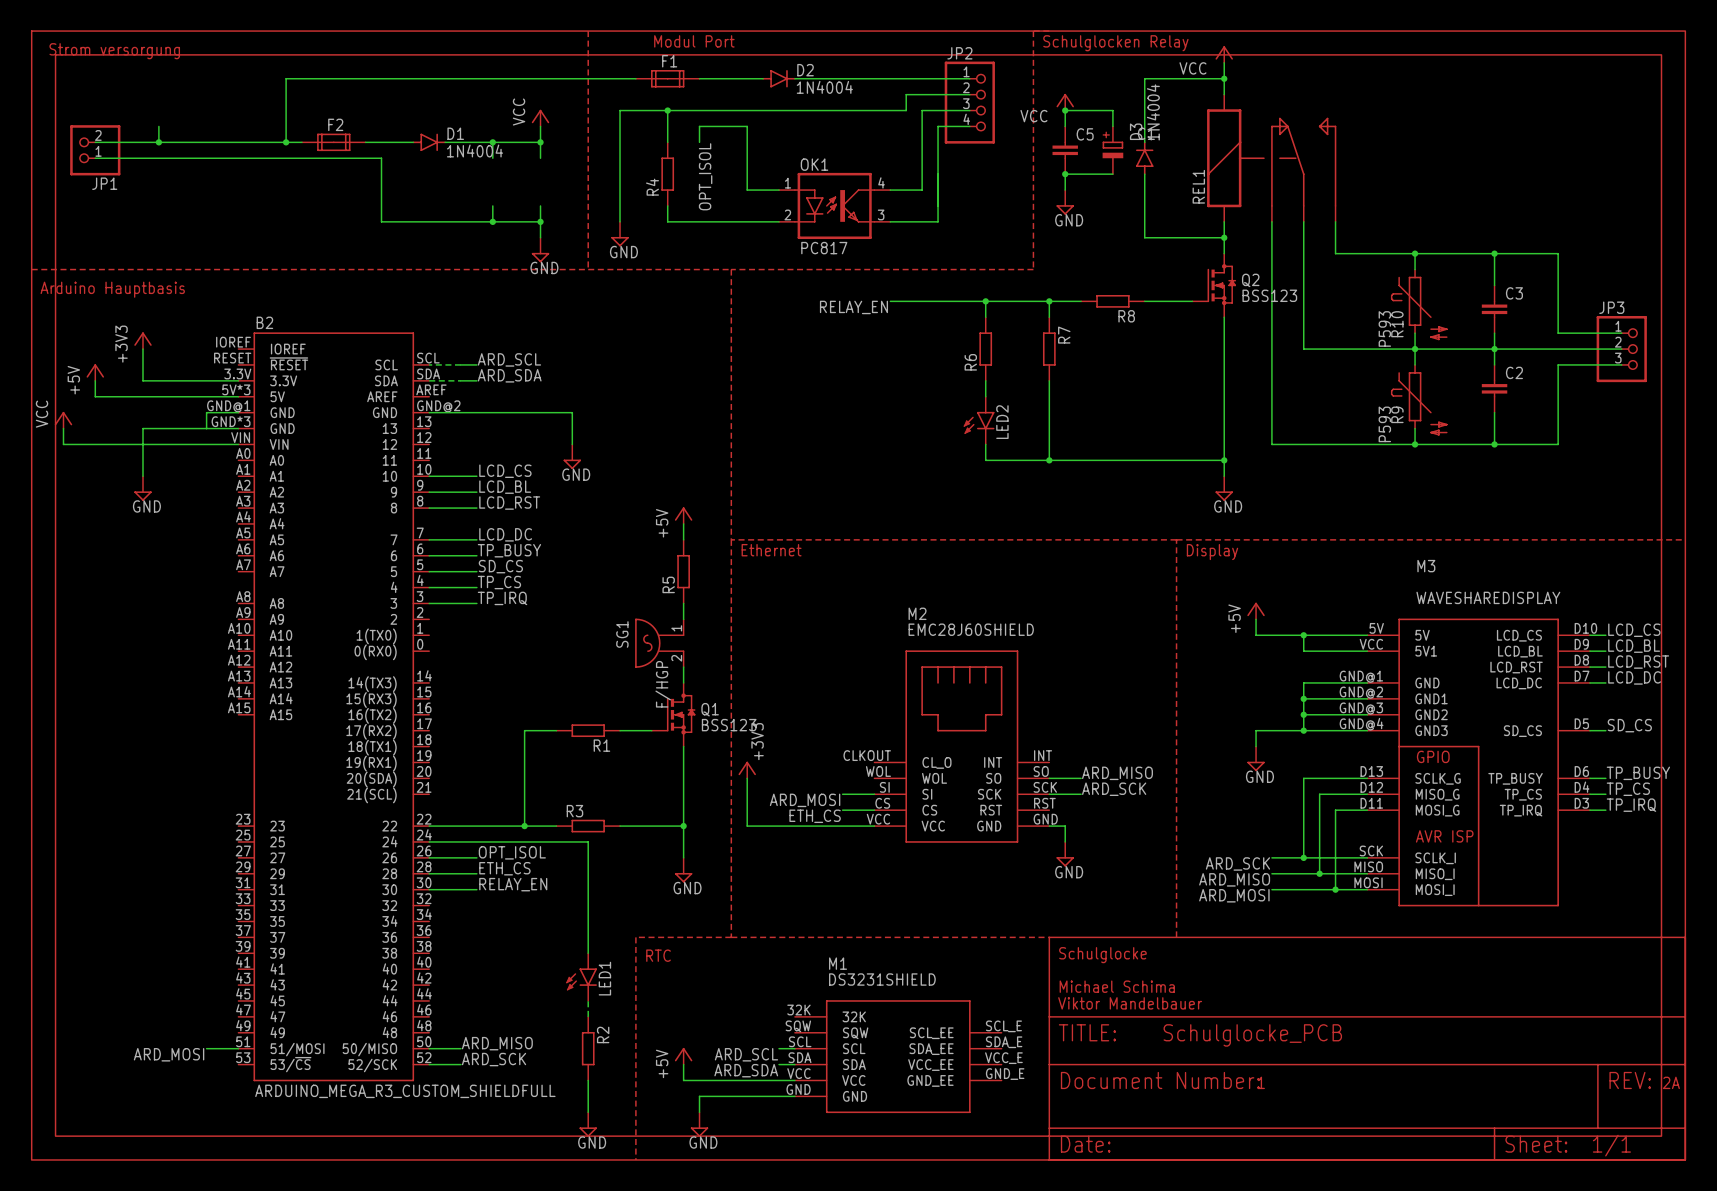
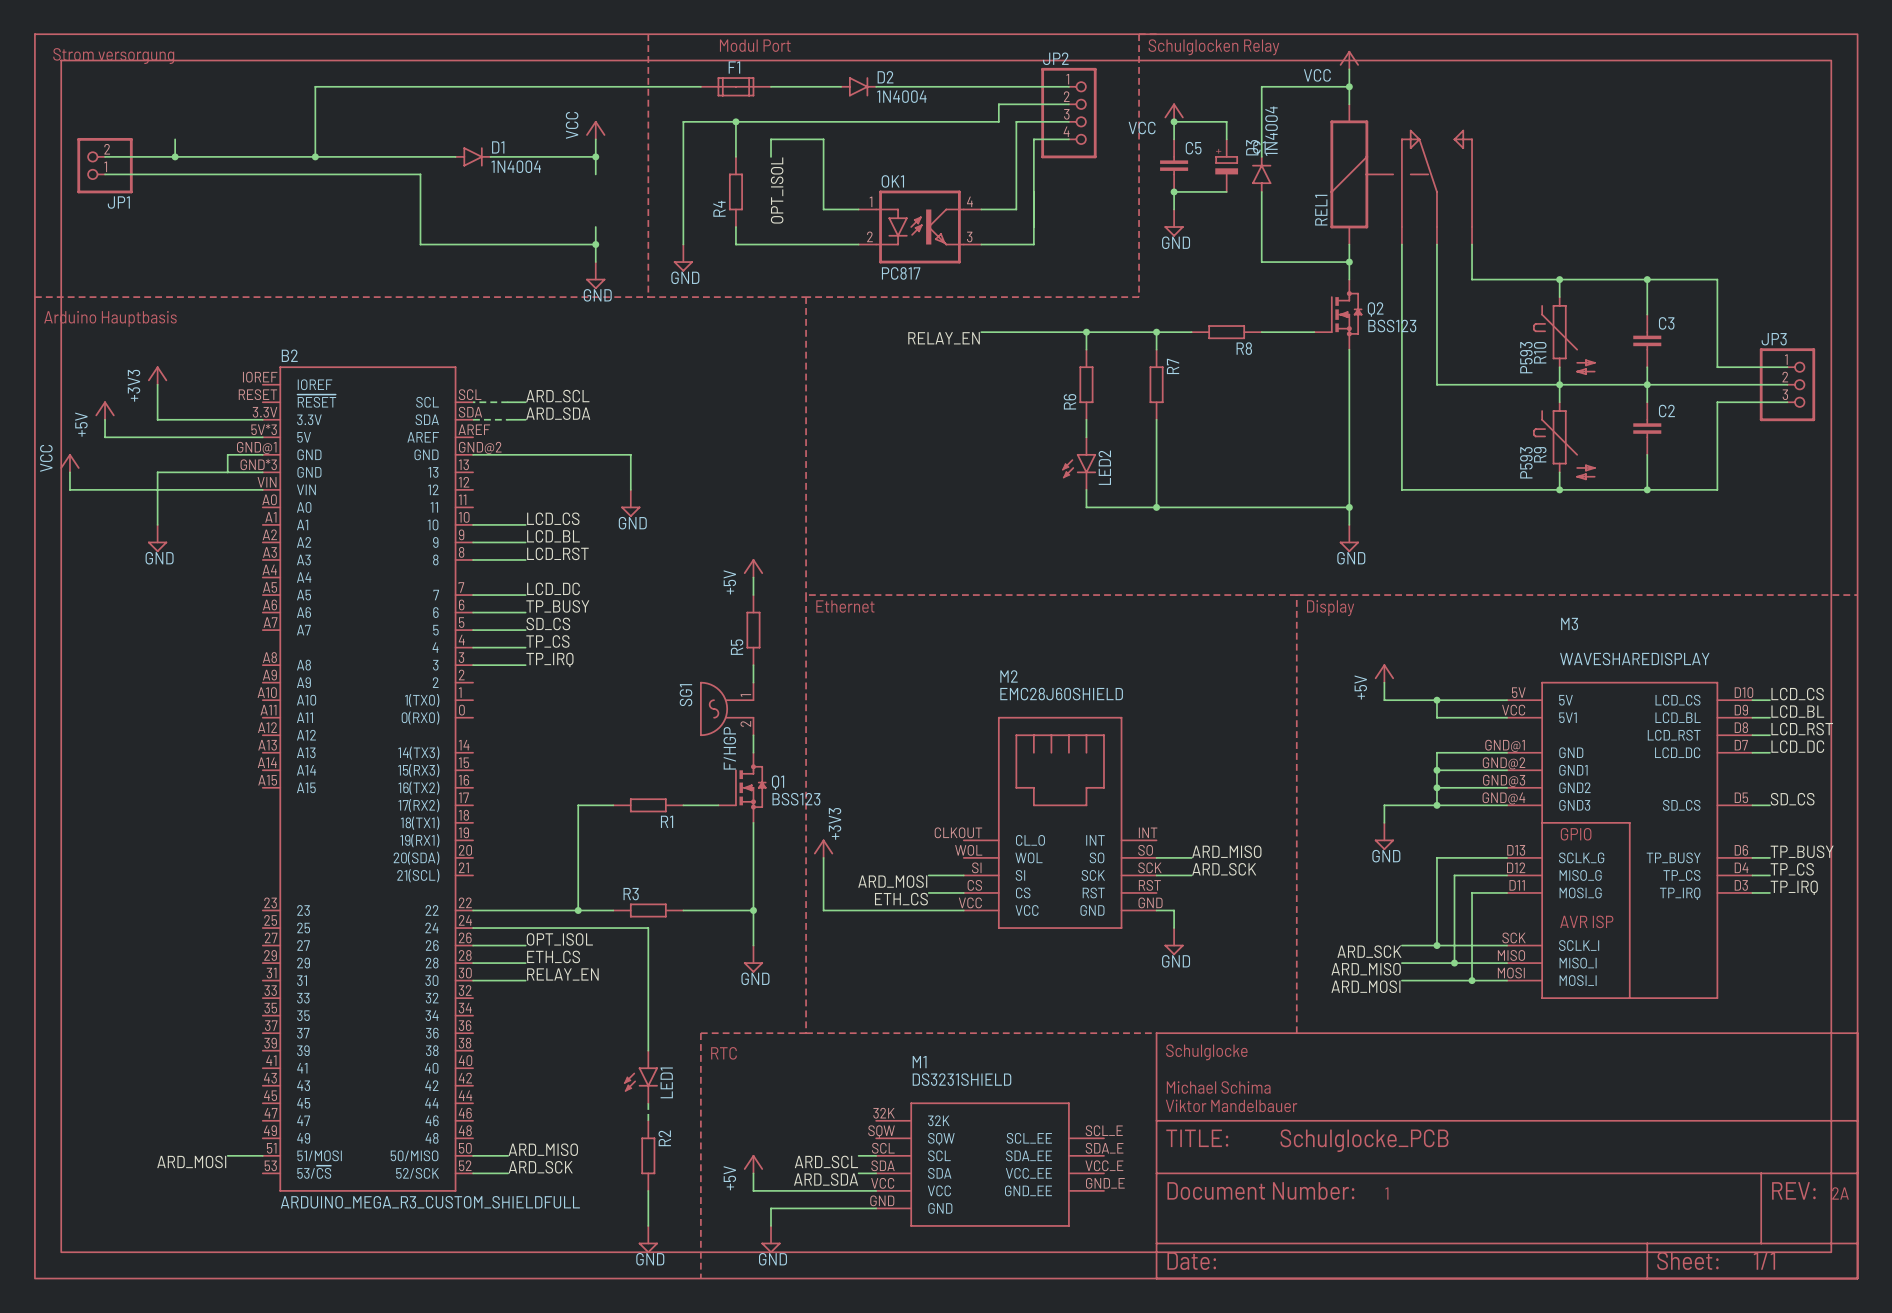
F2: (333, 142) -> none
wire: (492, 142) (492, 158) -> none
junction: (492, 142) -> none
wire: (492, 205) (492, 221) -> none
junction: (492, 221) -> none

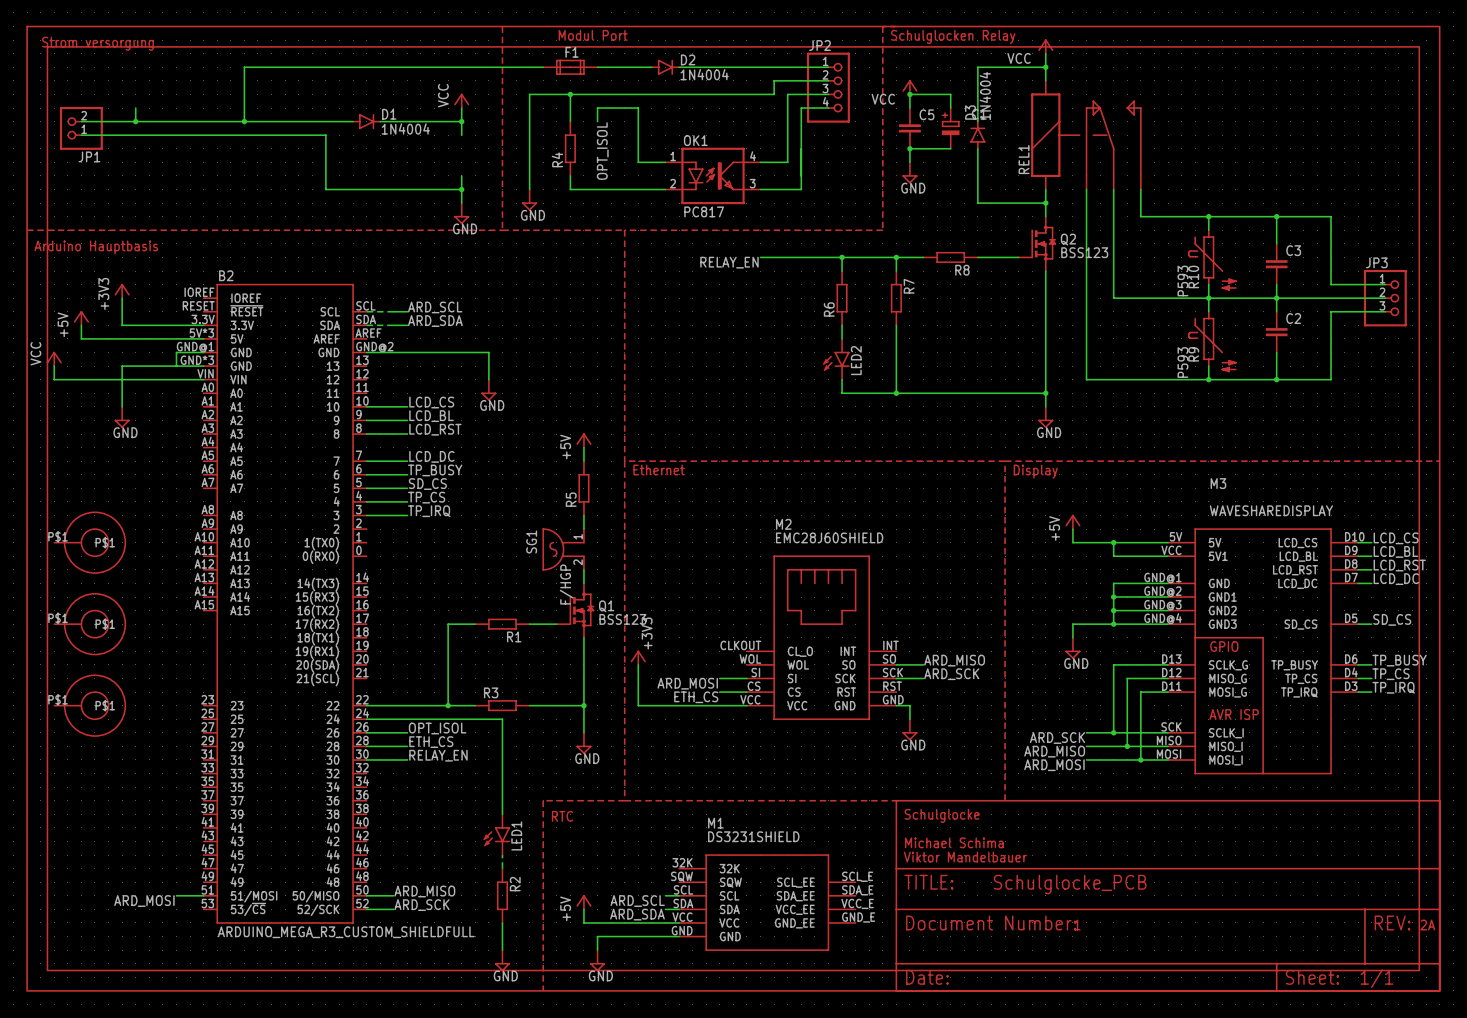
part: none -> (90, 542)
part: none -> (90, 624)
part: none -> (90, 705)

